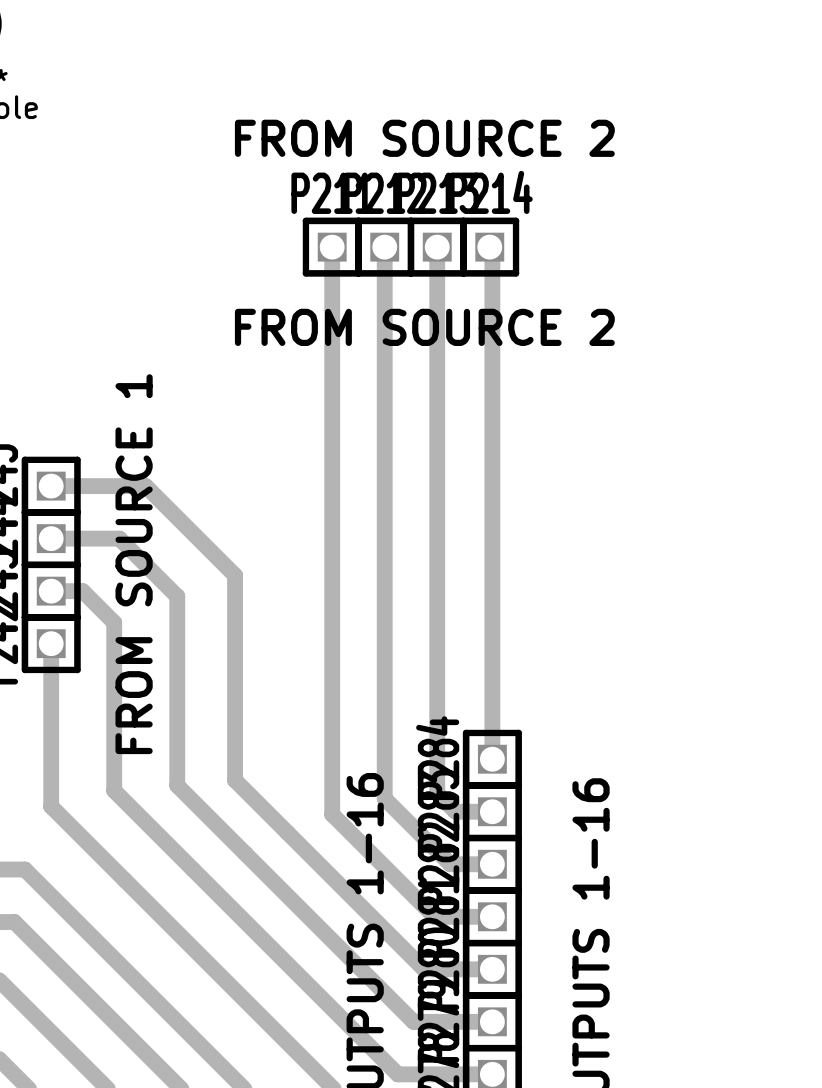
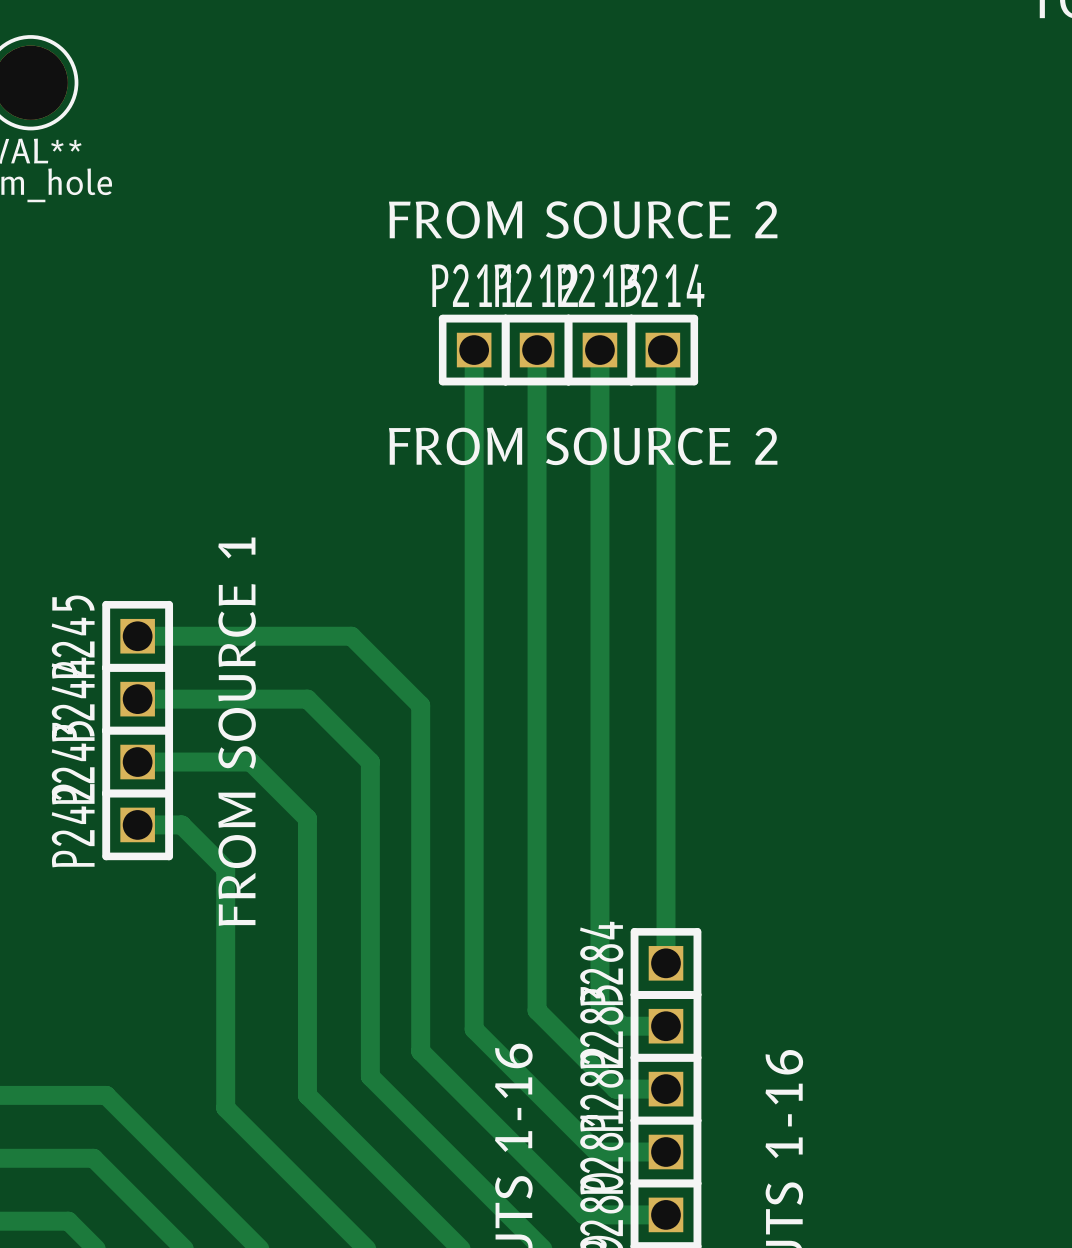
track: (145, 486) (235, 575) (235, 780) (287, 832) -> (250, 636) (351, 636) (420, 705) (420, 1051)
track: (119, 538) (177, 596) (177, 785) (245, 853) -> (219, 699) (307, 699) (370, 762) (370, 1076)
track: (82, 591) (114, 622) (114, 790) (193, 869) -> (175, 762) (250, 762) (307, 818) (307, 1095)
track: (51, 643) (51, 806) (124, 880) -> (137, 824) (181, 824) (225, 868) (225, 1107)

